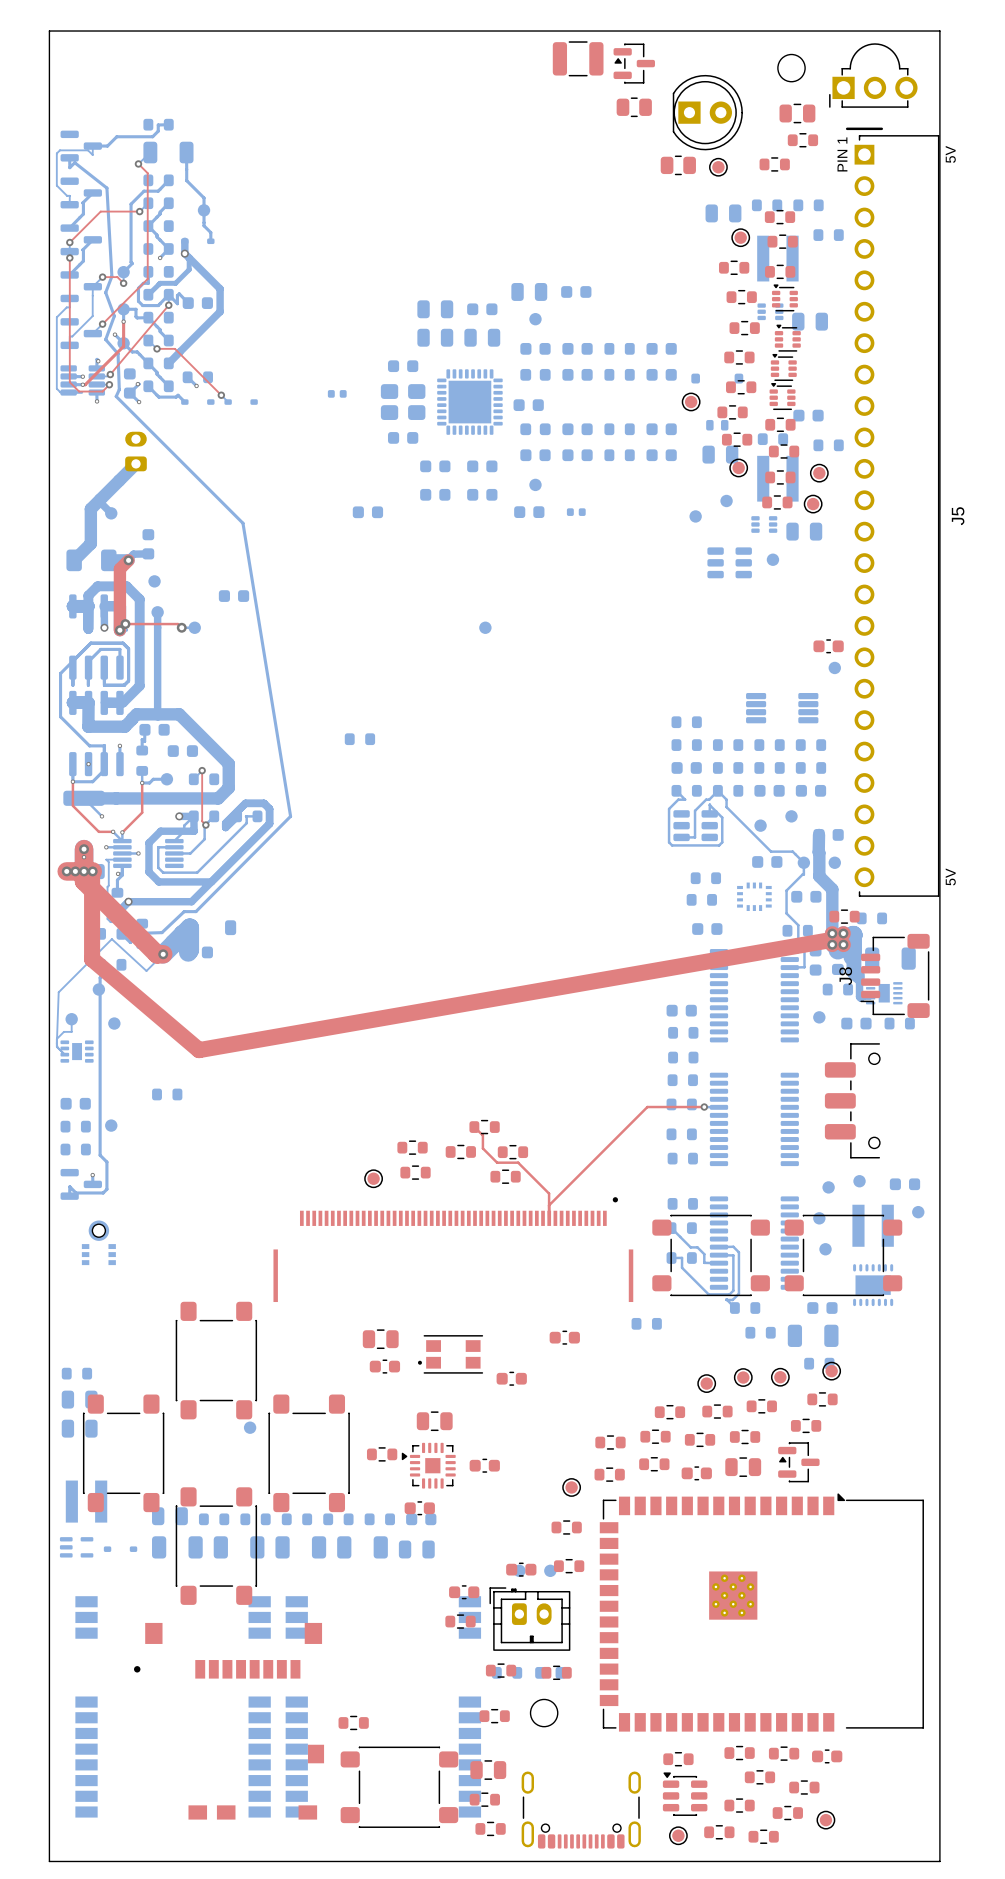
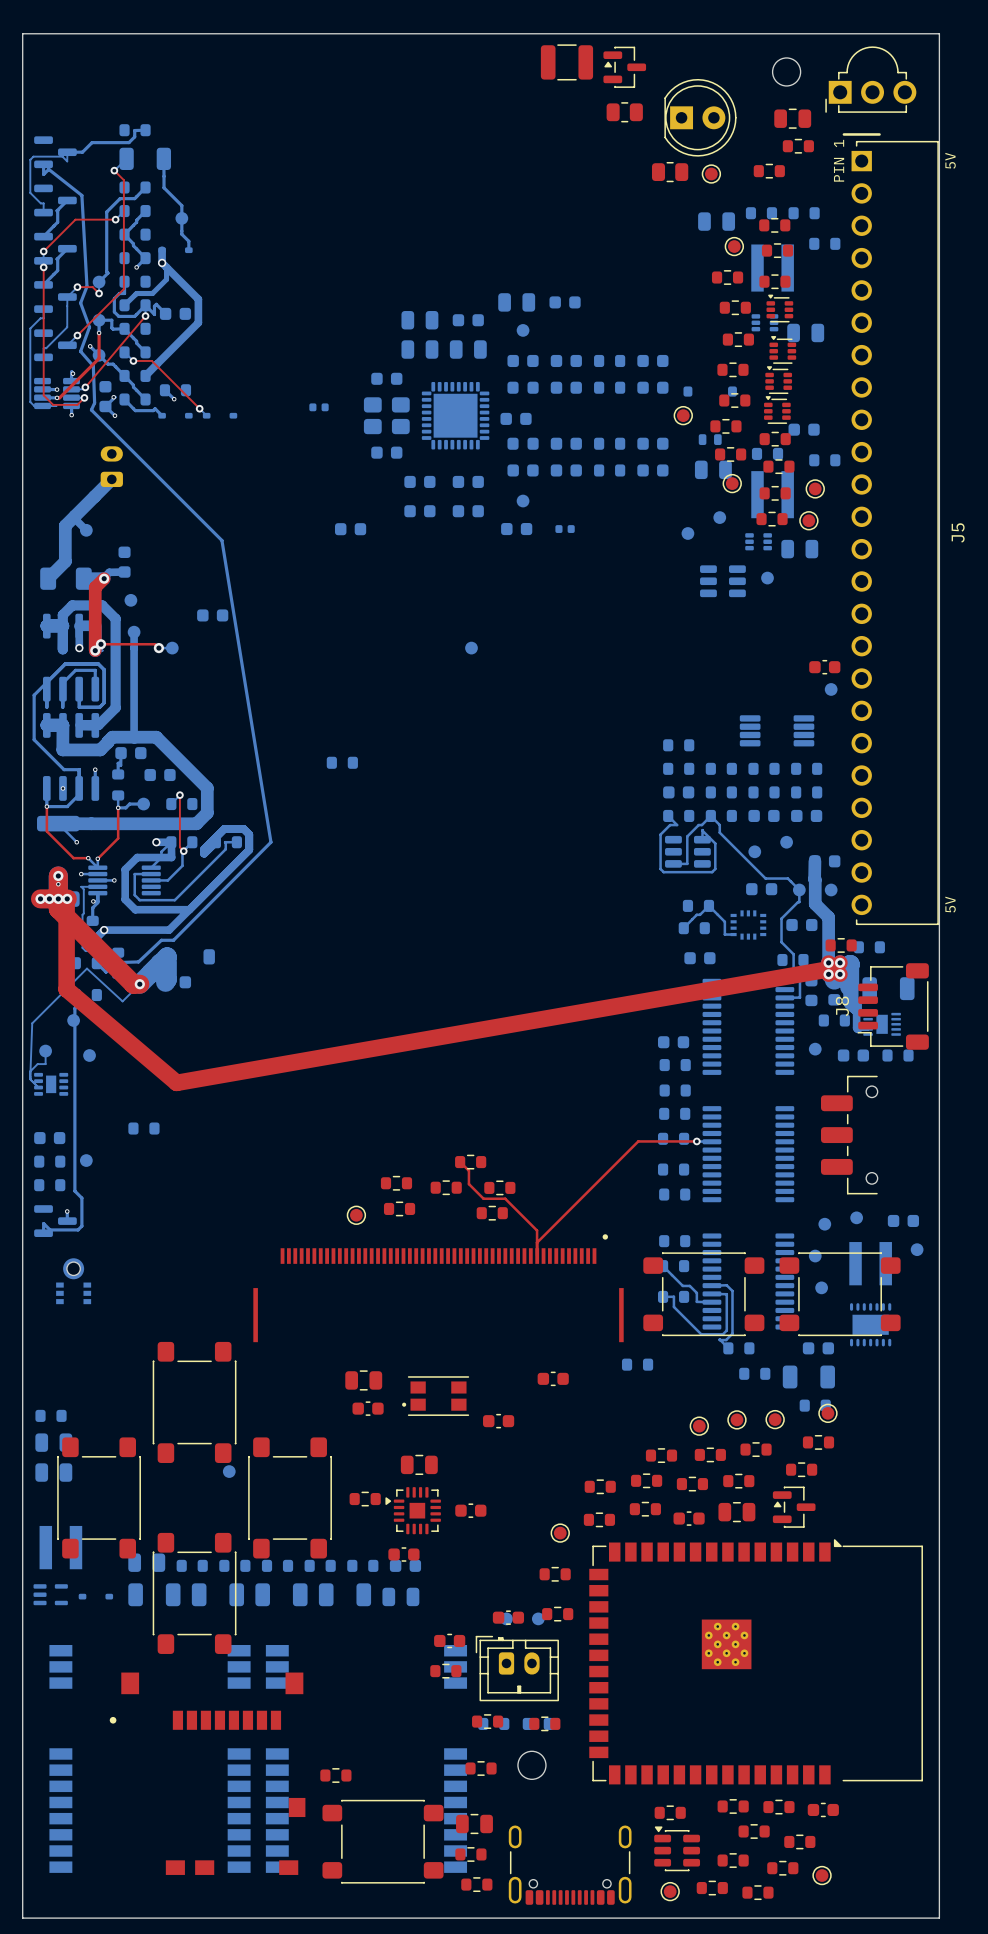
bottom track: none -> (683, 928) (708, 905) (724, 921) (724, 934) (733, 934)

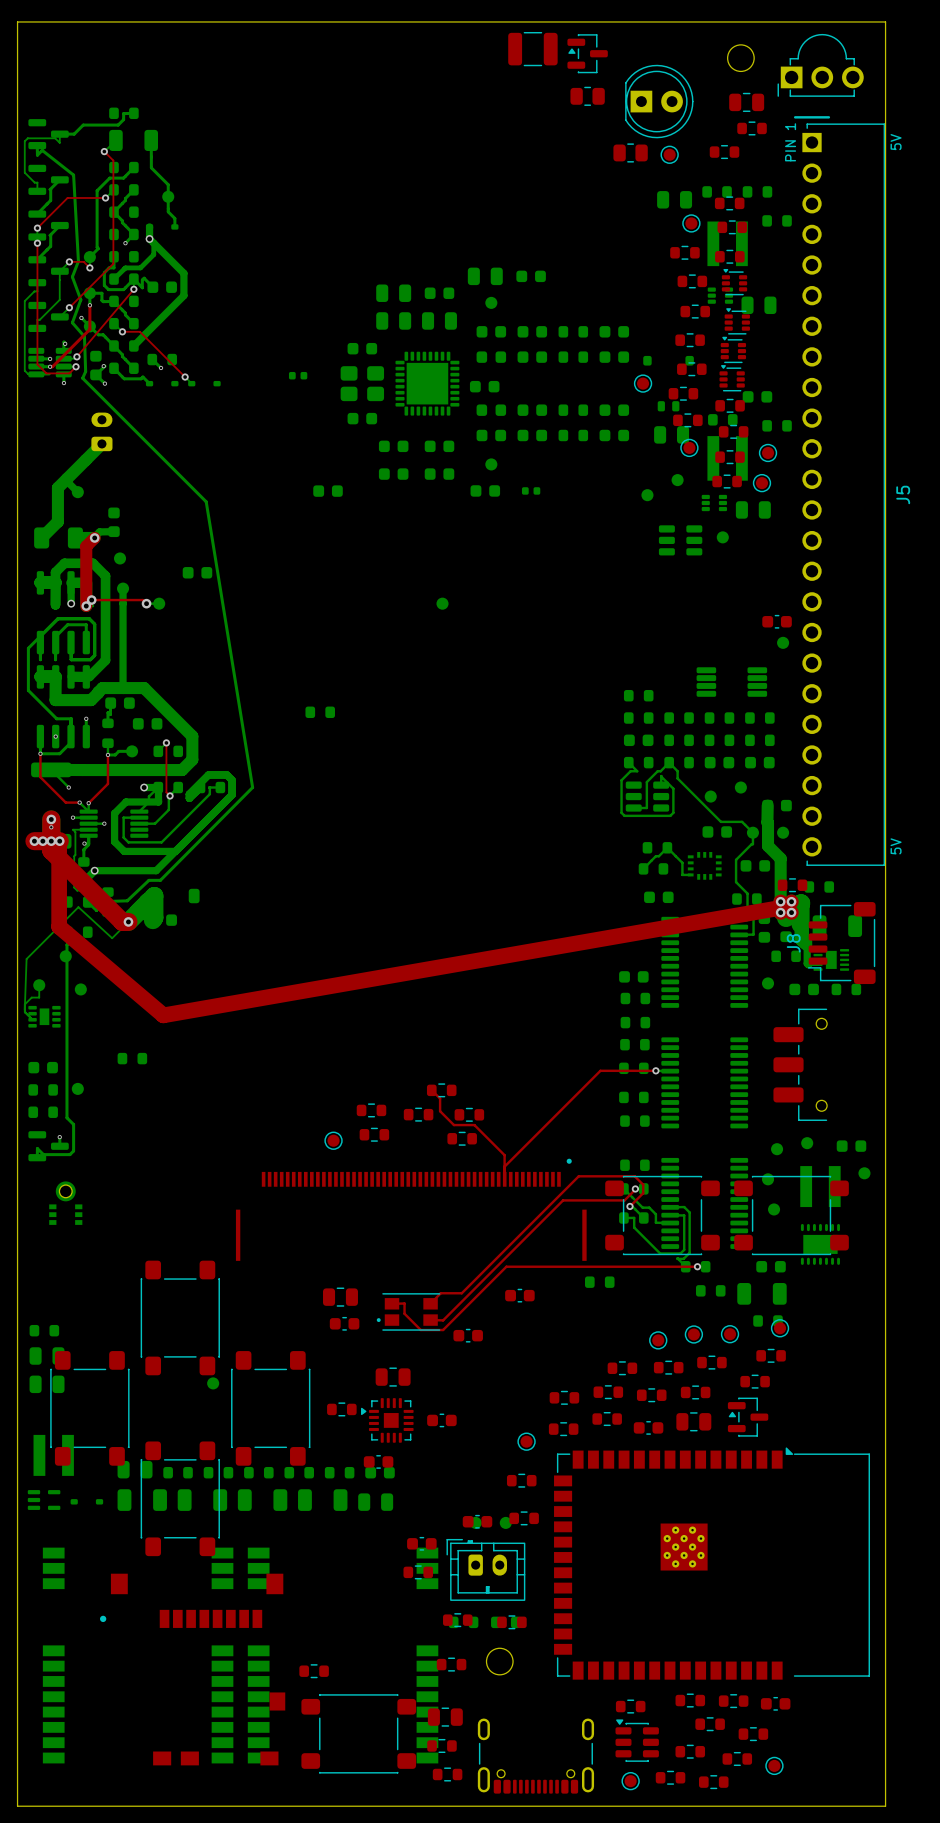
top track: none -> (635, 1188) (624, 1200) (563, 1200) (443, 1320) (430, 1320)
via: none -> (635, 1188)
top track: none -> (629, 1206) (643, 1193) (643, 1184) (634, 1176) (578, 1176) (461, 1293) (440, 1293) (430, 1303)
bottom track: none -> (629, 1206) (632, 1206) (643, 1218)
via: none -> (629, 1206)
top track: none -> (697, 1266) (506, 1266) (443, 1330) (420, 1330) (404, 1313) (404, 1303) (392, 1303)
via: none -> (697, 1266)

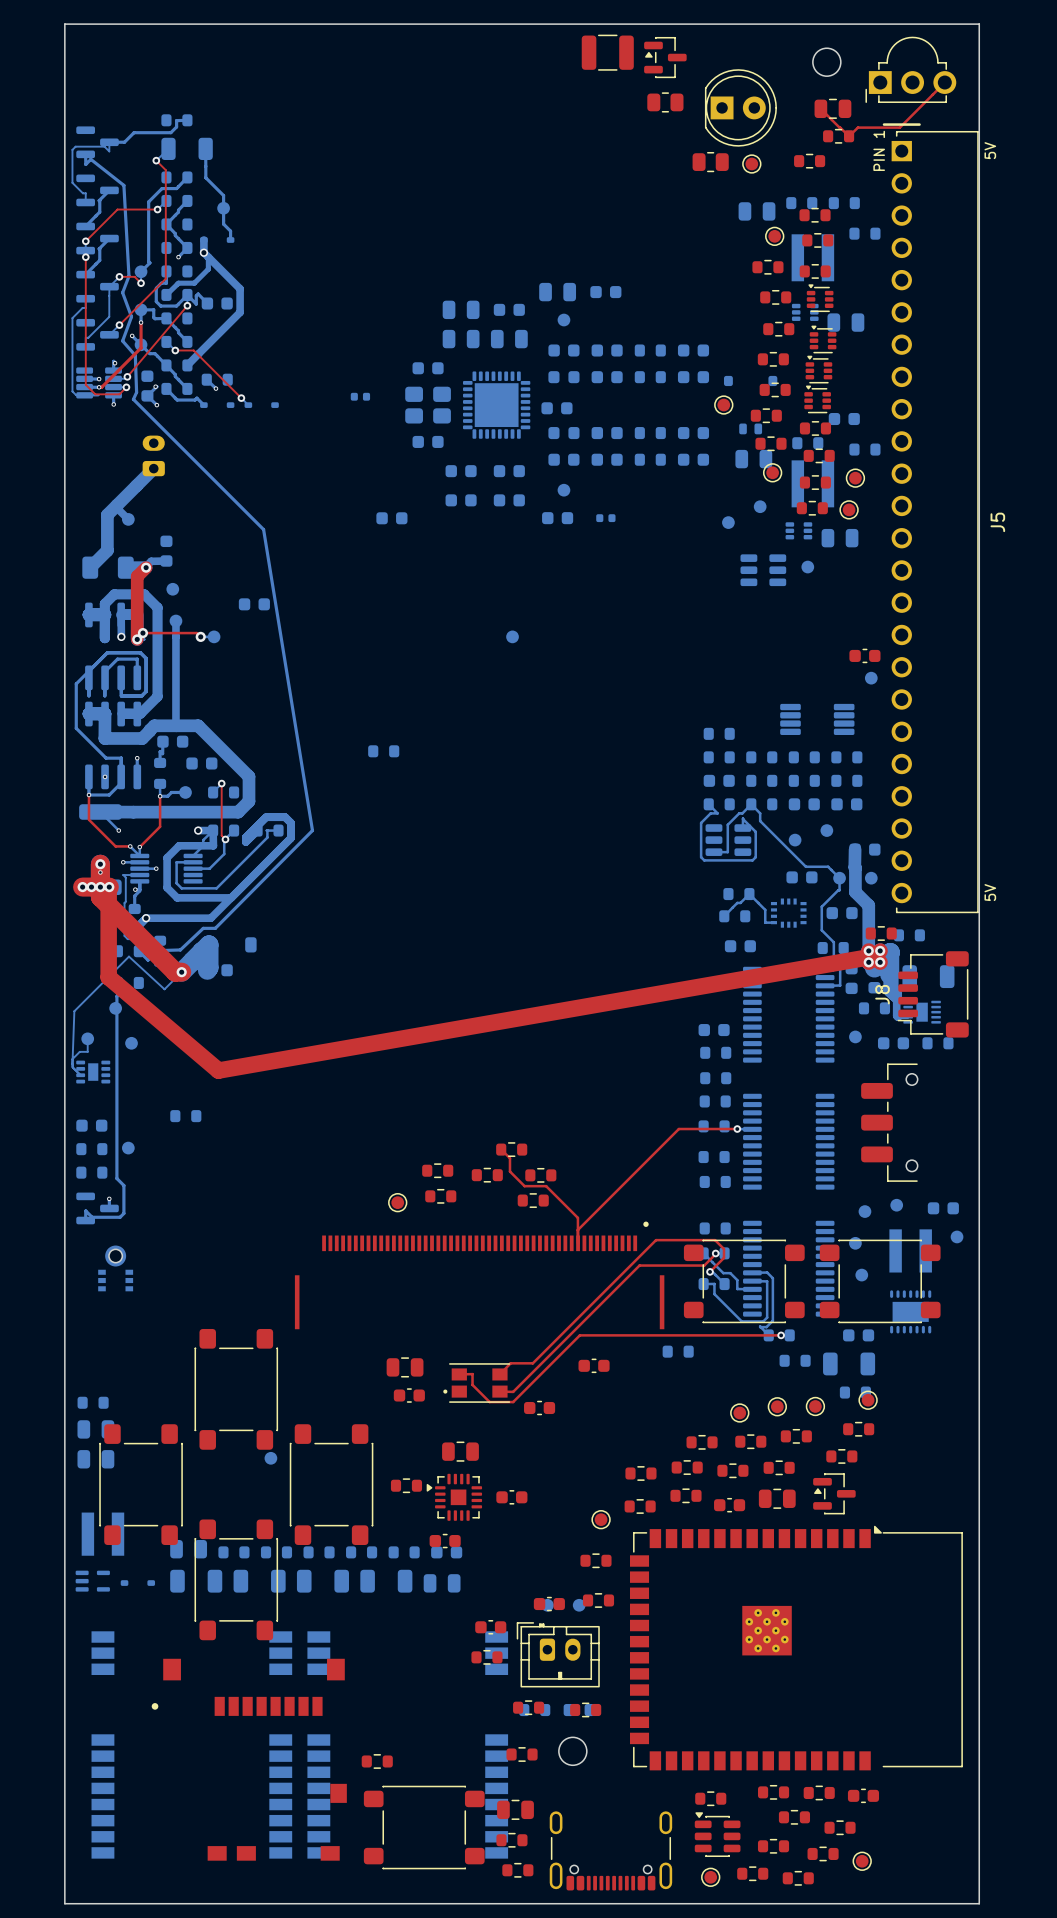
top track: none -> (944, 82) (899, 127) (857, 127) (849, 136) (820, 108)

